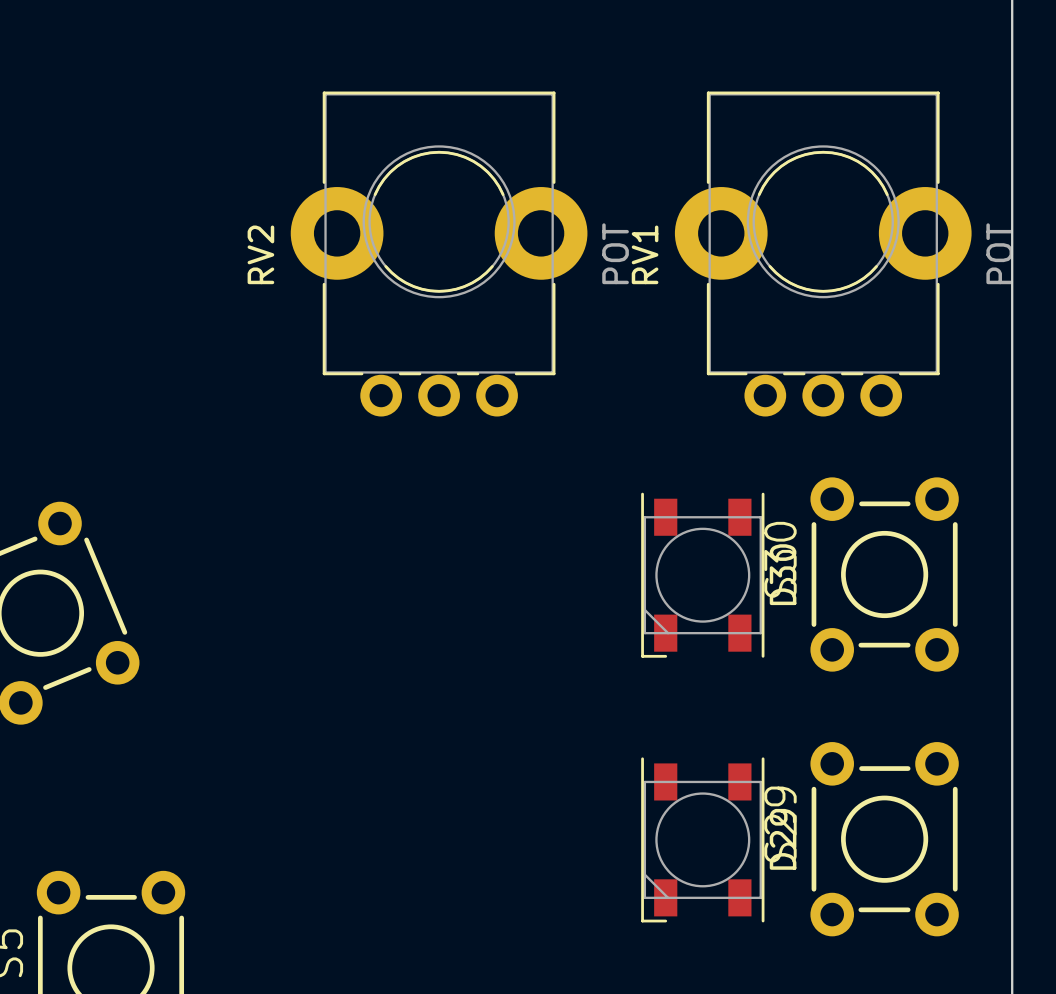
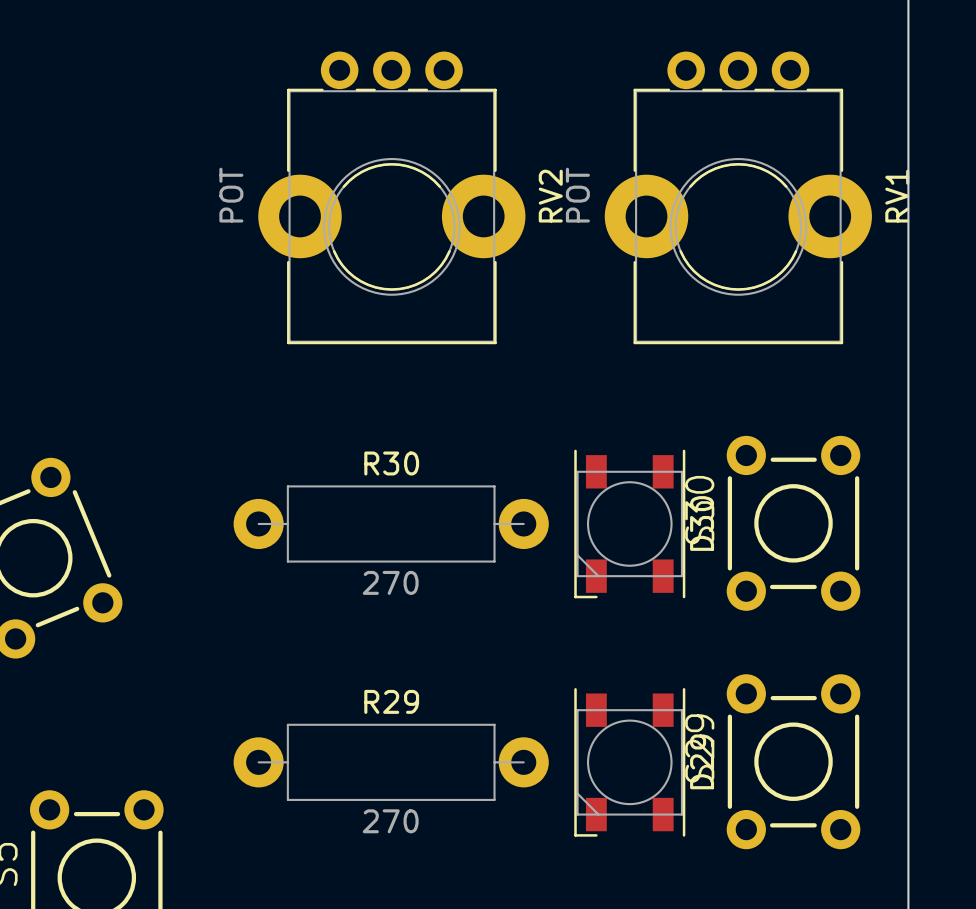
RV2 rotation: 0° (439, 254) -> 180° (391, 197)
RV1 rotation: 0° (823, 254) -> 180° (738, 197)
R30: none -> 270 (391, 523)
R29: none -> 270 (391, 762)

